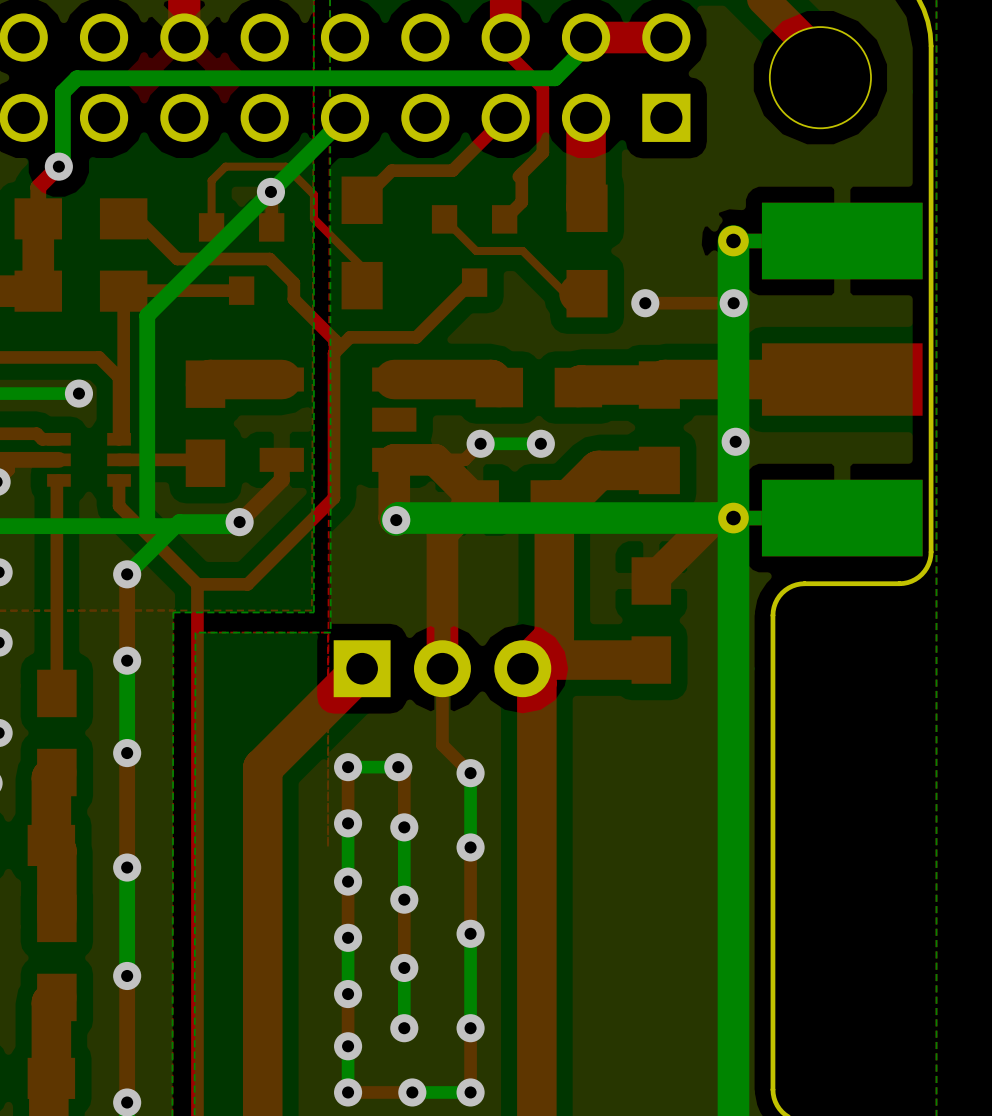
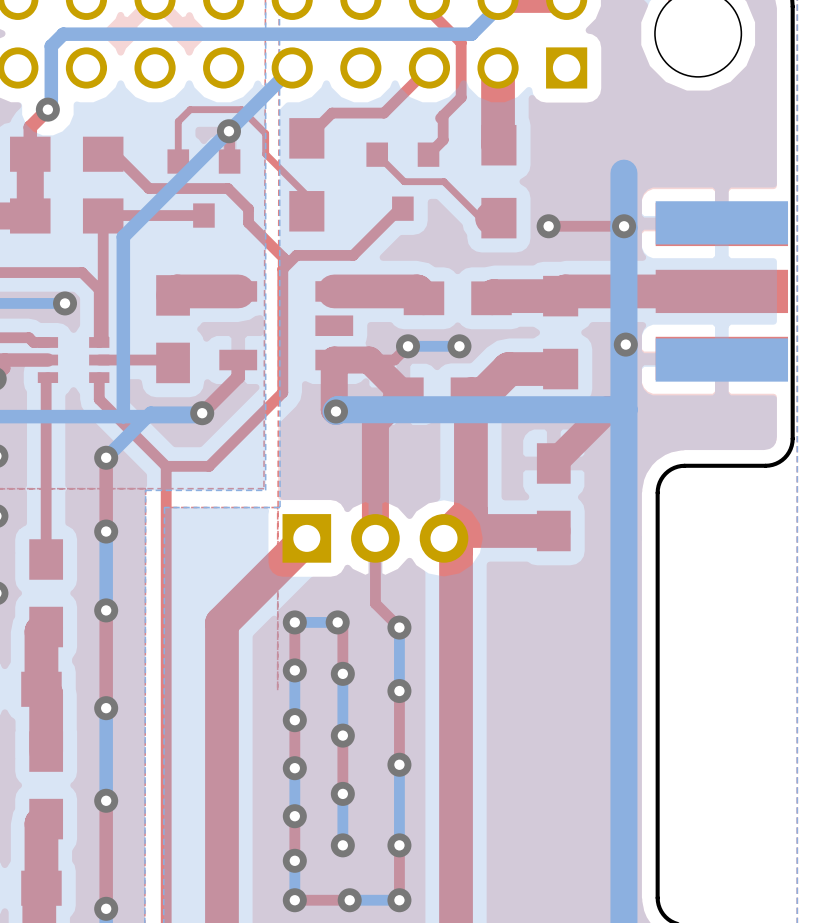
part footprint: [718, 202, 923, 557] -> [655, 201, 789, 382]

